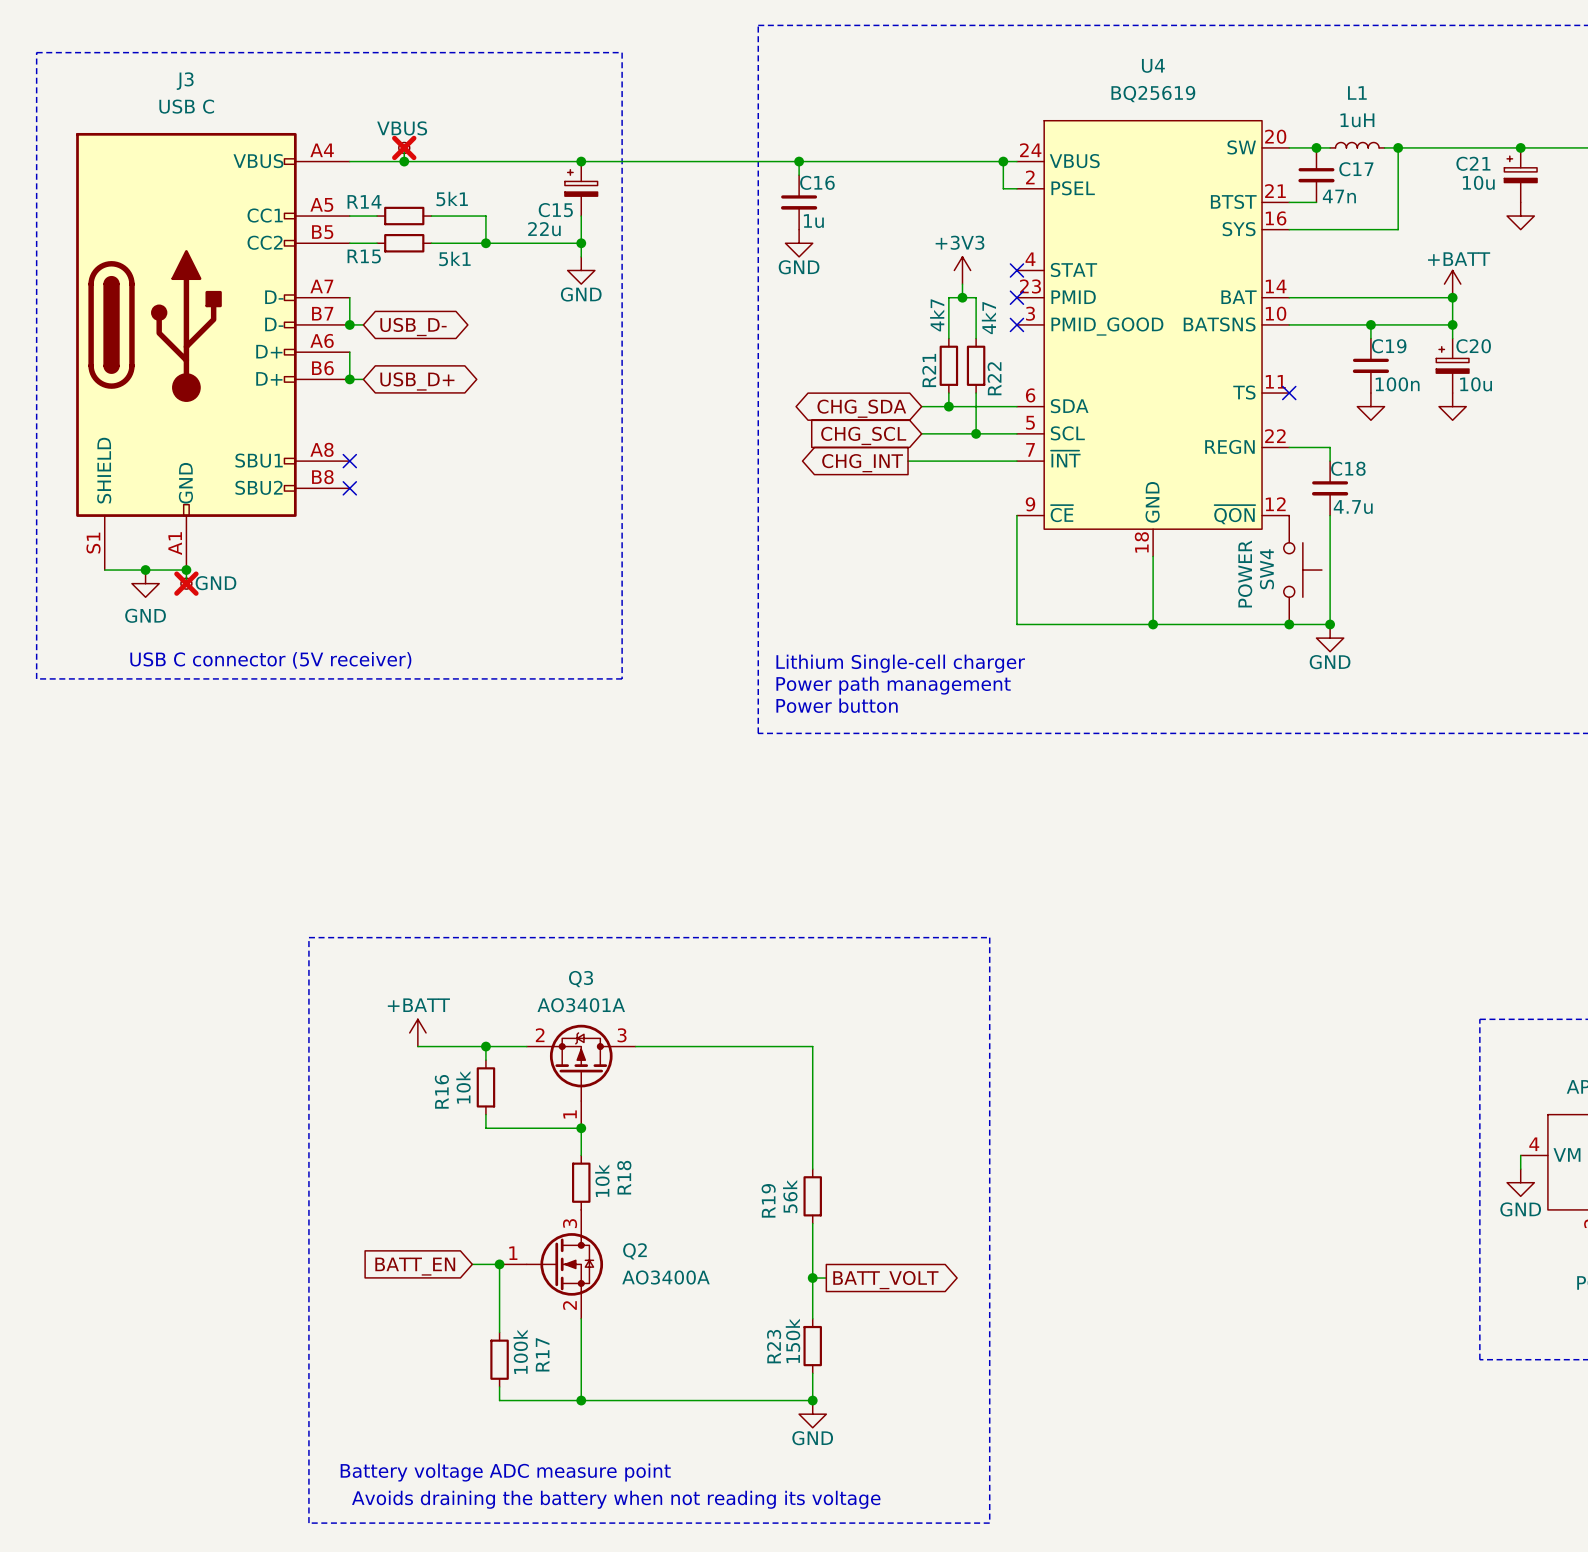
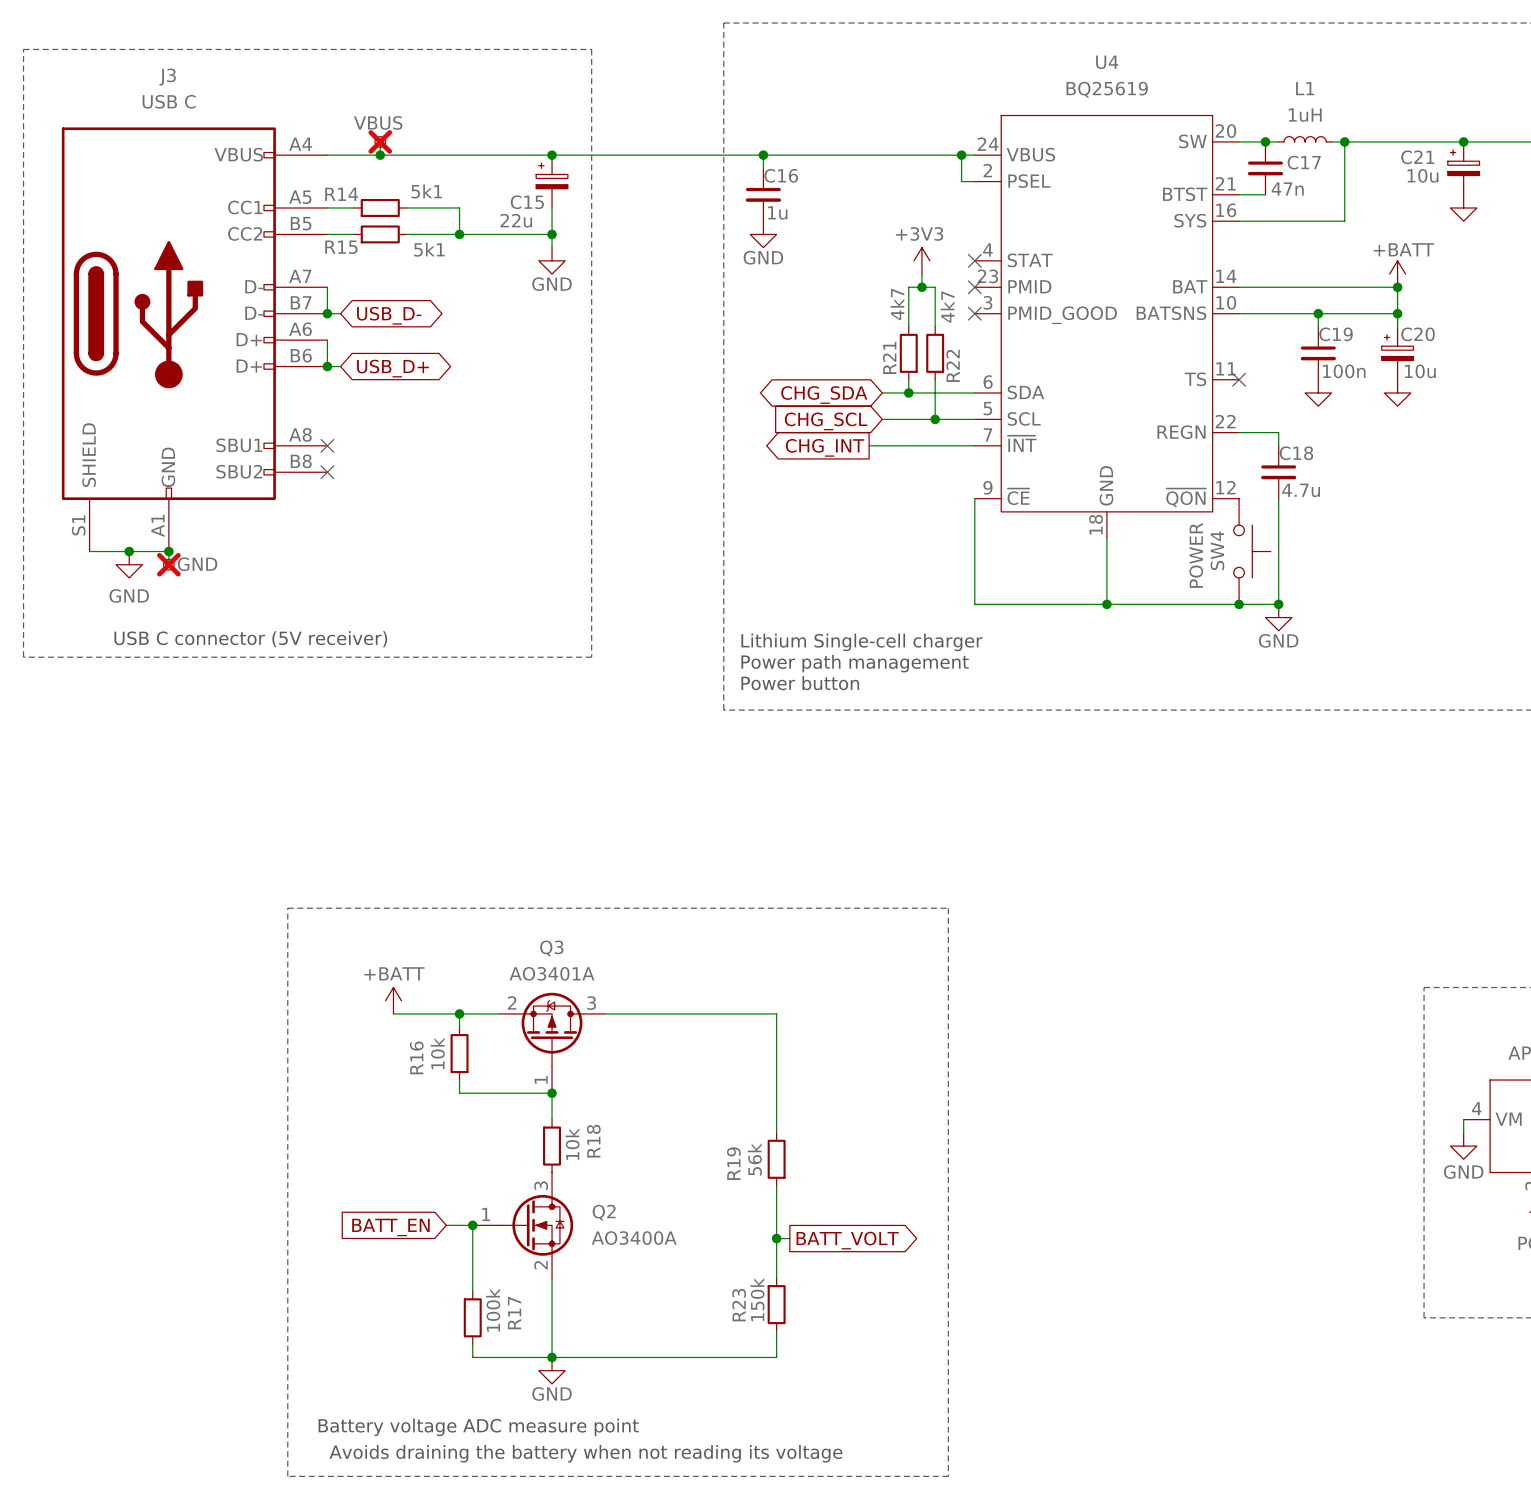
junction: (812, 1400) -> none
power symbol position: GND (812, 1414) -> GND (552, 1370)

